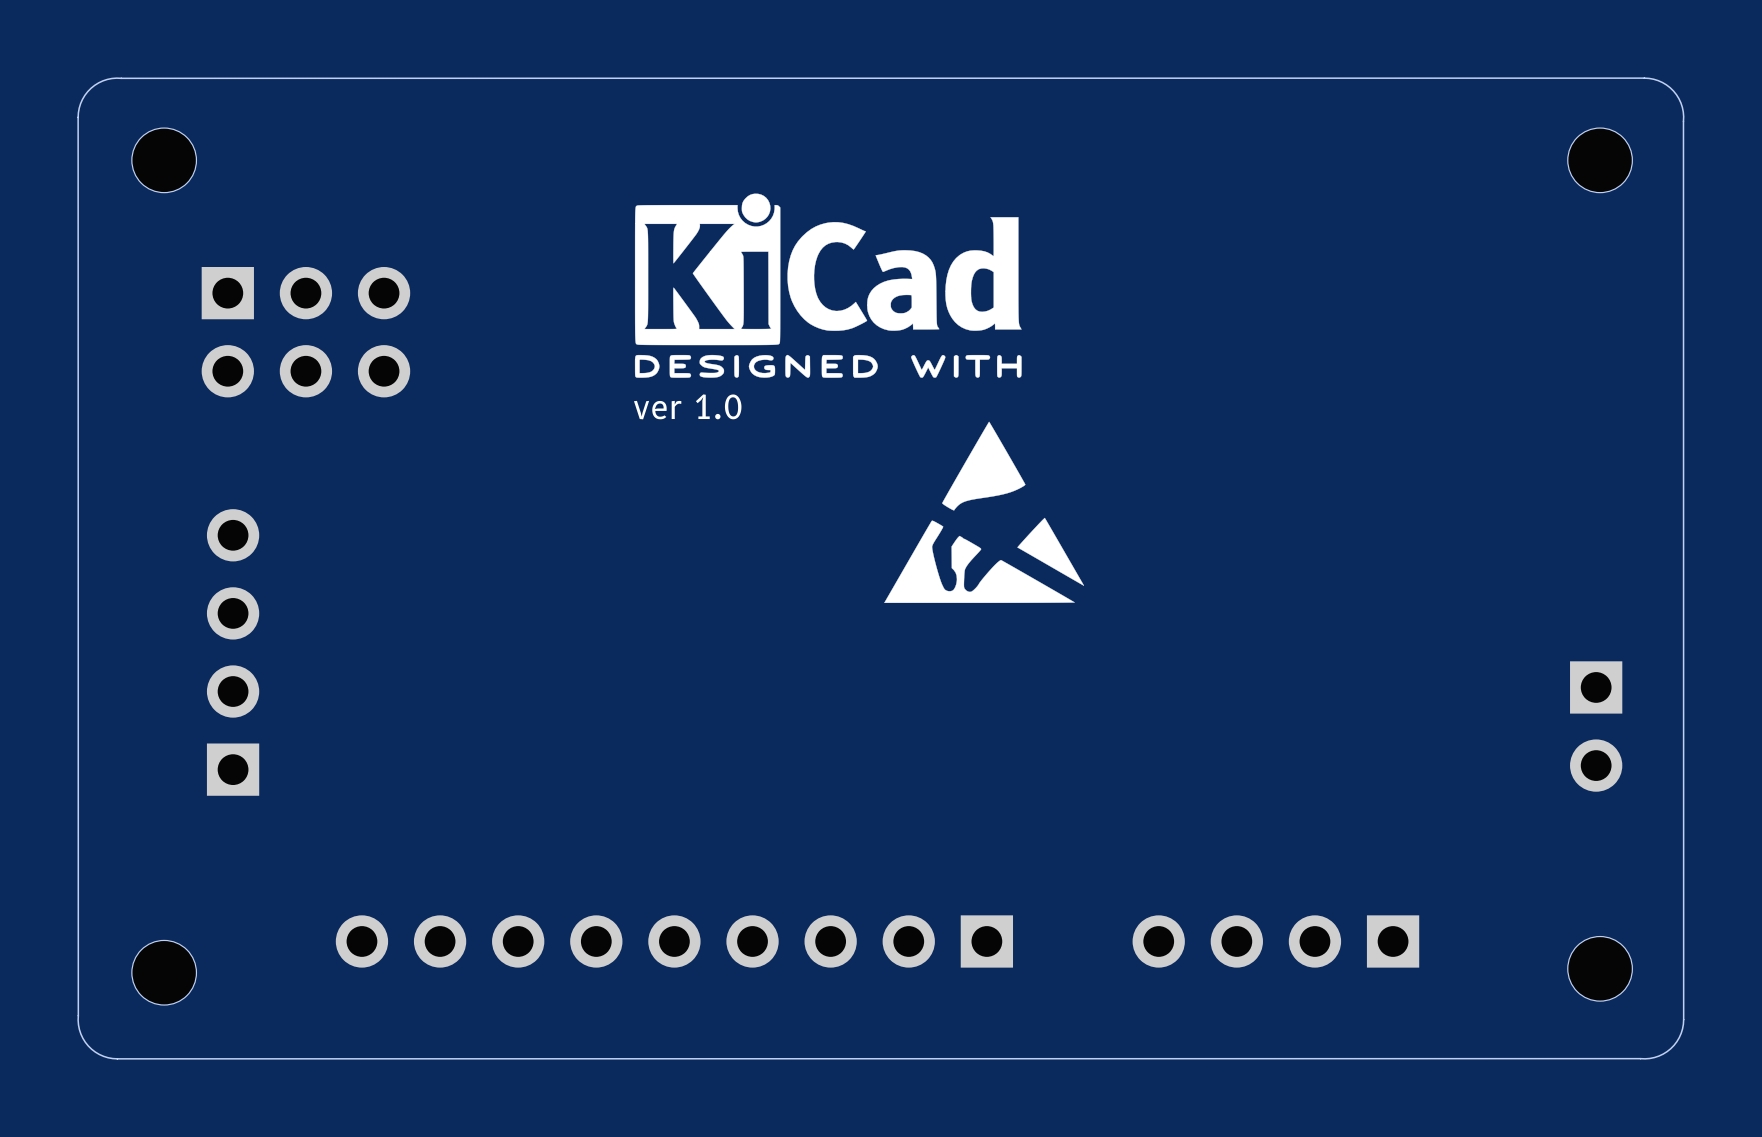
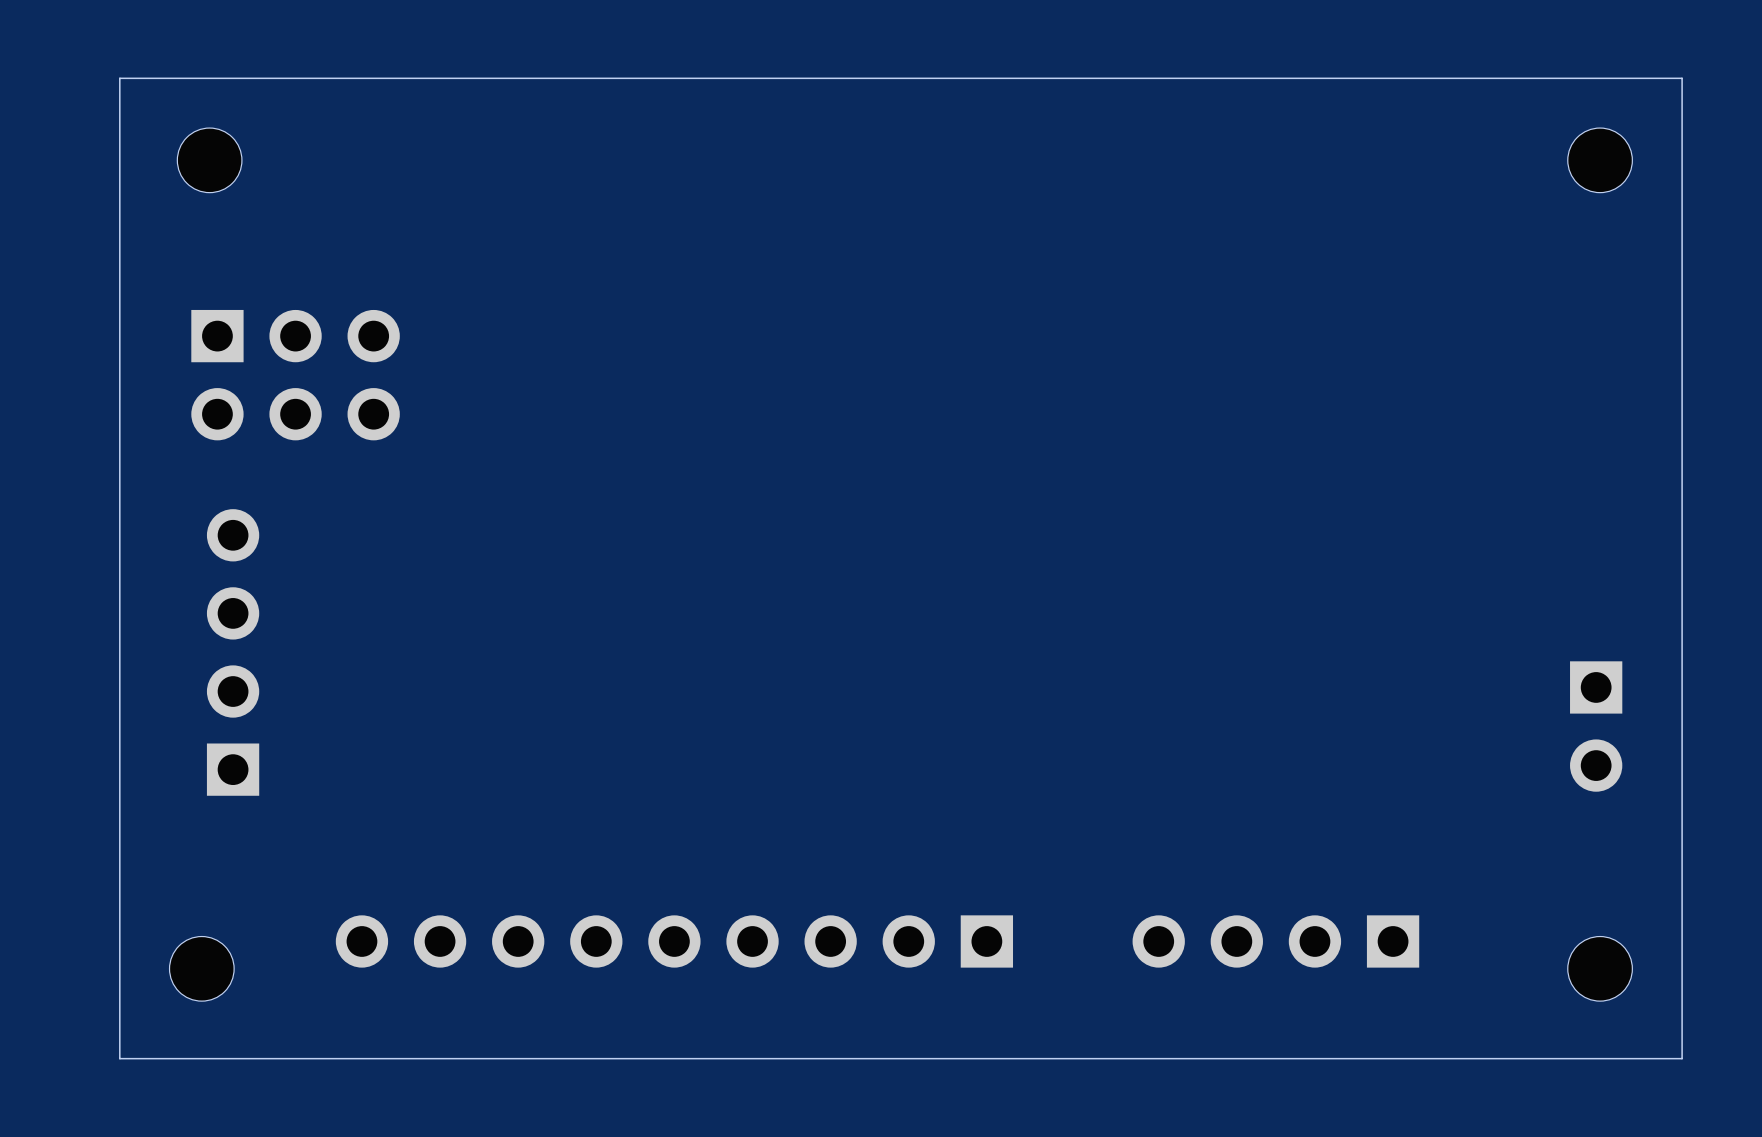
board edge: (1644, 78) (116, 78) (98, 82) (84, 95) (80, 103) (78, 117) (78, 1020) (82, 1038) (95, 1052) (108, 1057) (117, 1058) (1645, 1058) (1663, 1054) (1676, 1041) (1682, 1028) (1683, 1019) (1683, 116) (1678, 98) (1670, 87) (1658, 80) (1644, 78) -> (1682, 78) (1682, 1058) (119, 1058) (119, 78) (1682, 78)
part position: (164, 160) -> (209, 160)
drawing: [634, 193, 1022, 378] -> none
part position: (305, 332) -> (295, 375)
text: ver 1.0 (687, 406) -> none
drawing: [884, 421, 1084, 603] -> none
part position: (164, 972) -> (201, 968)

